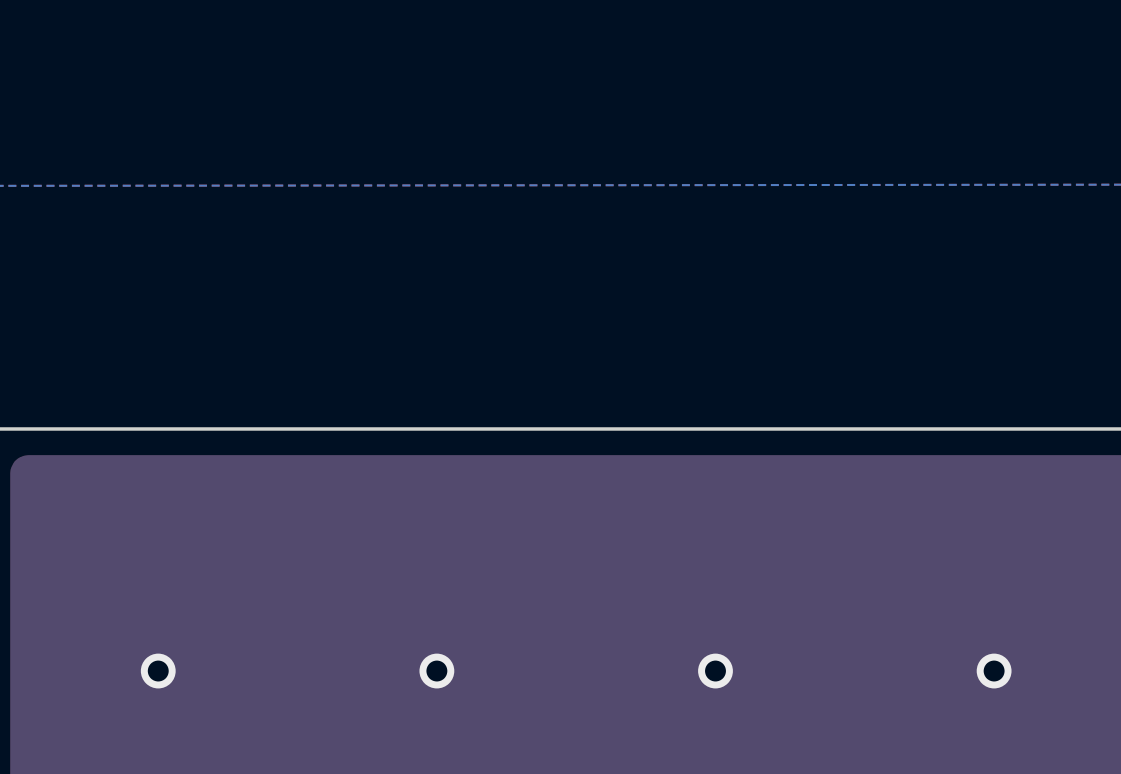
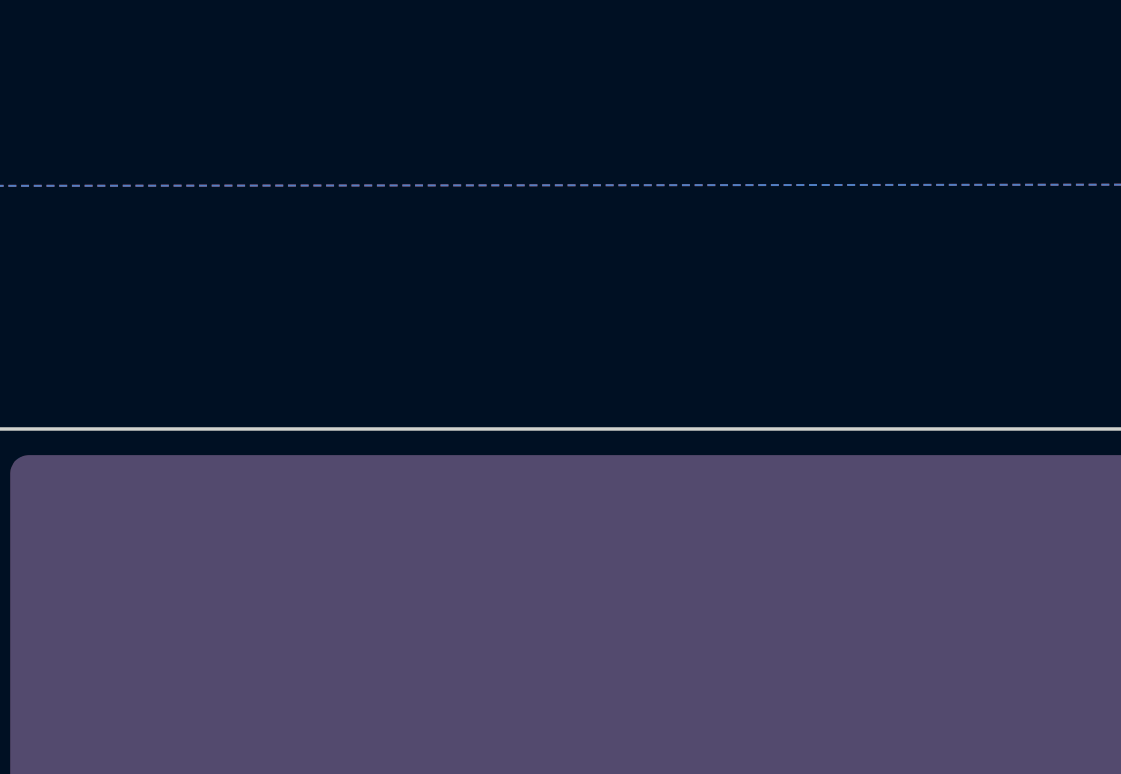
via: (158, 671) -> none
via: (436, 671) -> none
via: (715, 671) -> none
via: (994, 671) -> none

